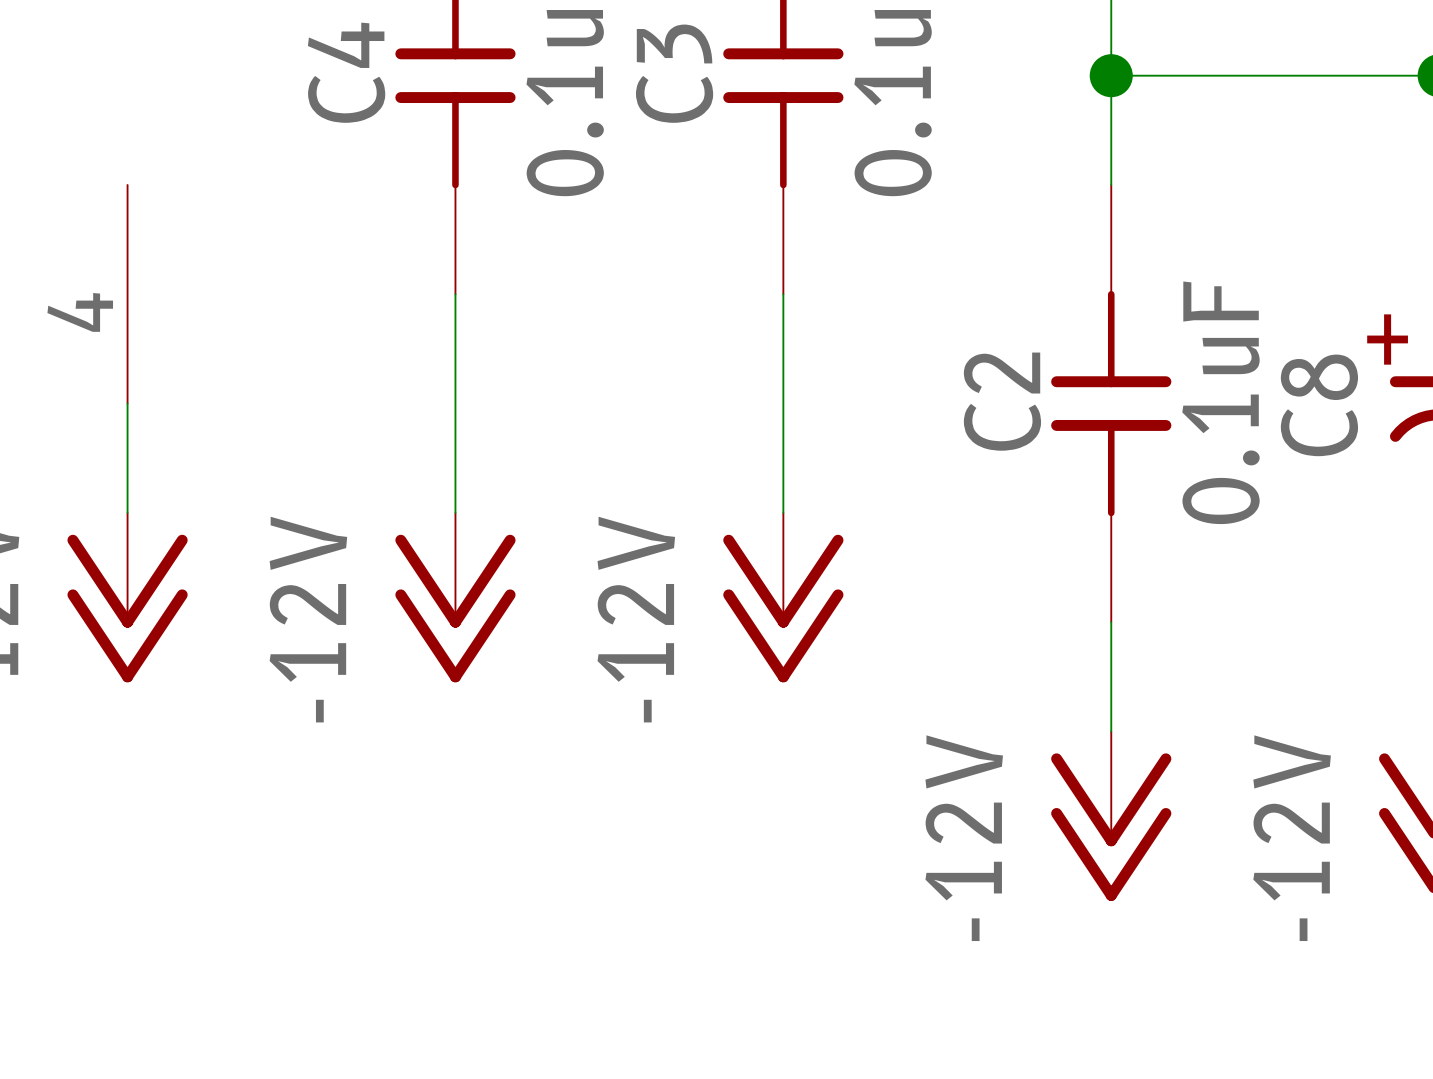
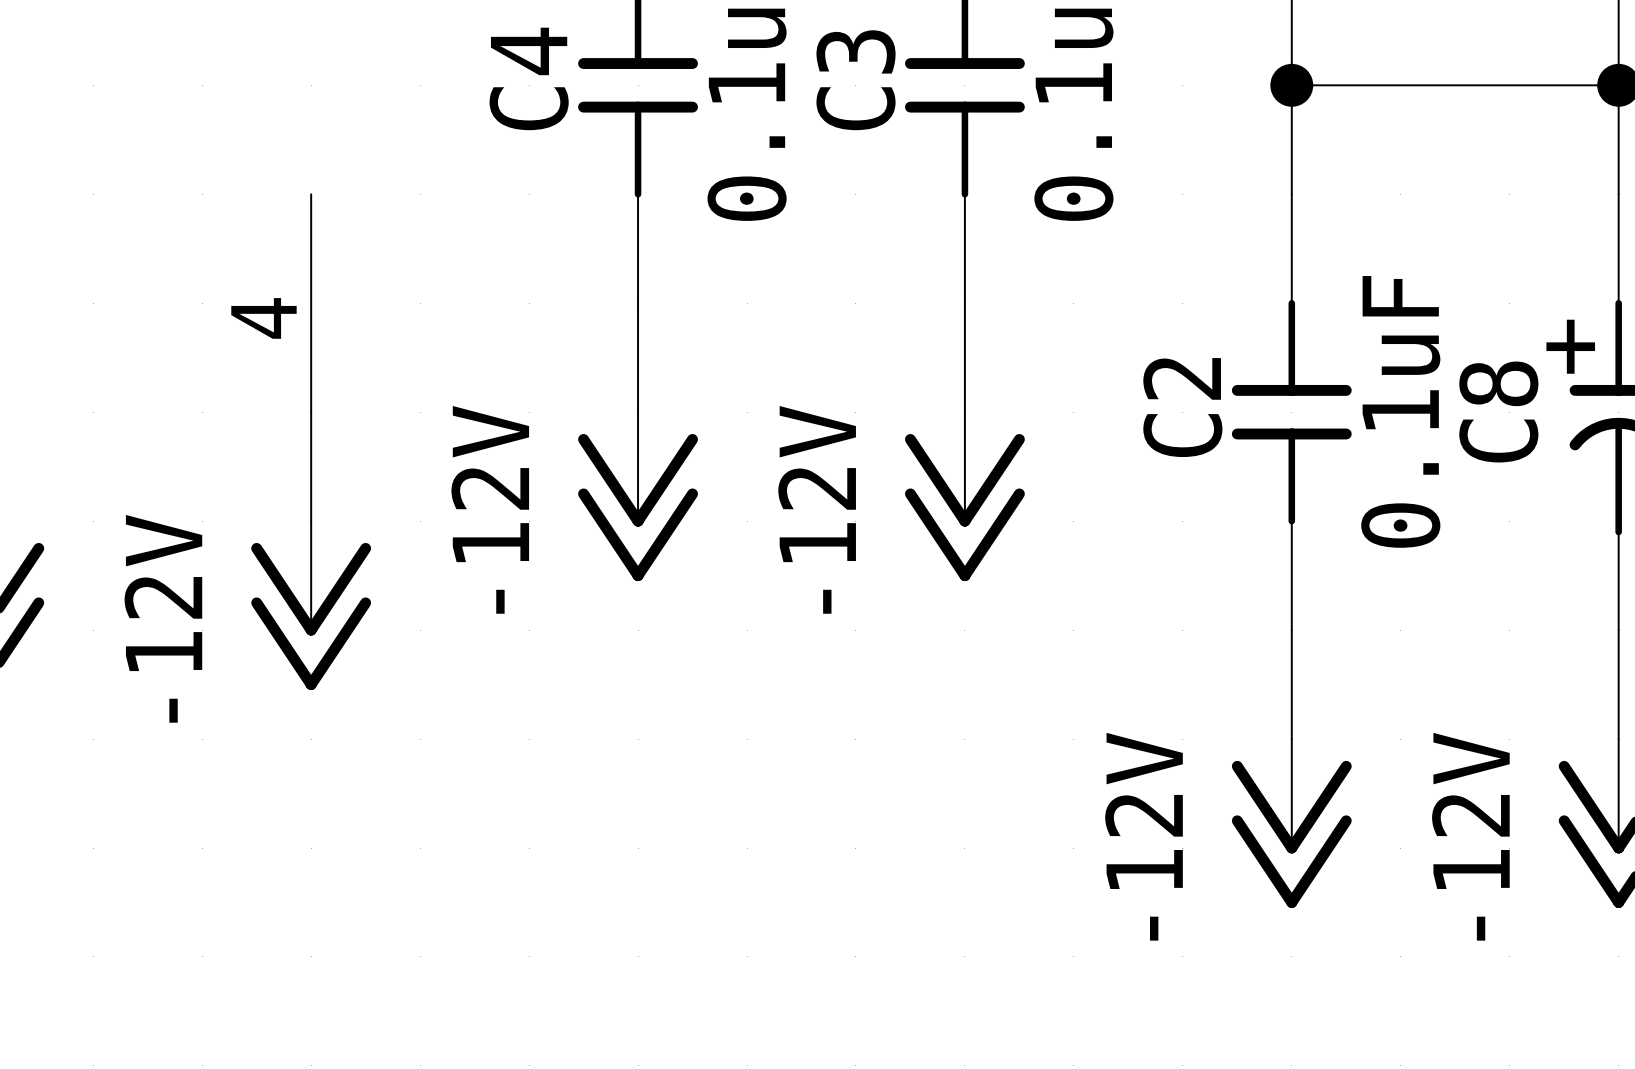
power symbol position: -12V (455, 597) -> -12V (638, 496)
power symbol position: -12V (783, 597) -> -12V (964, 496)

